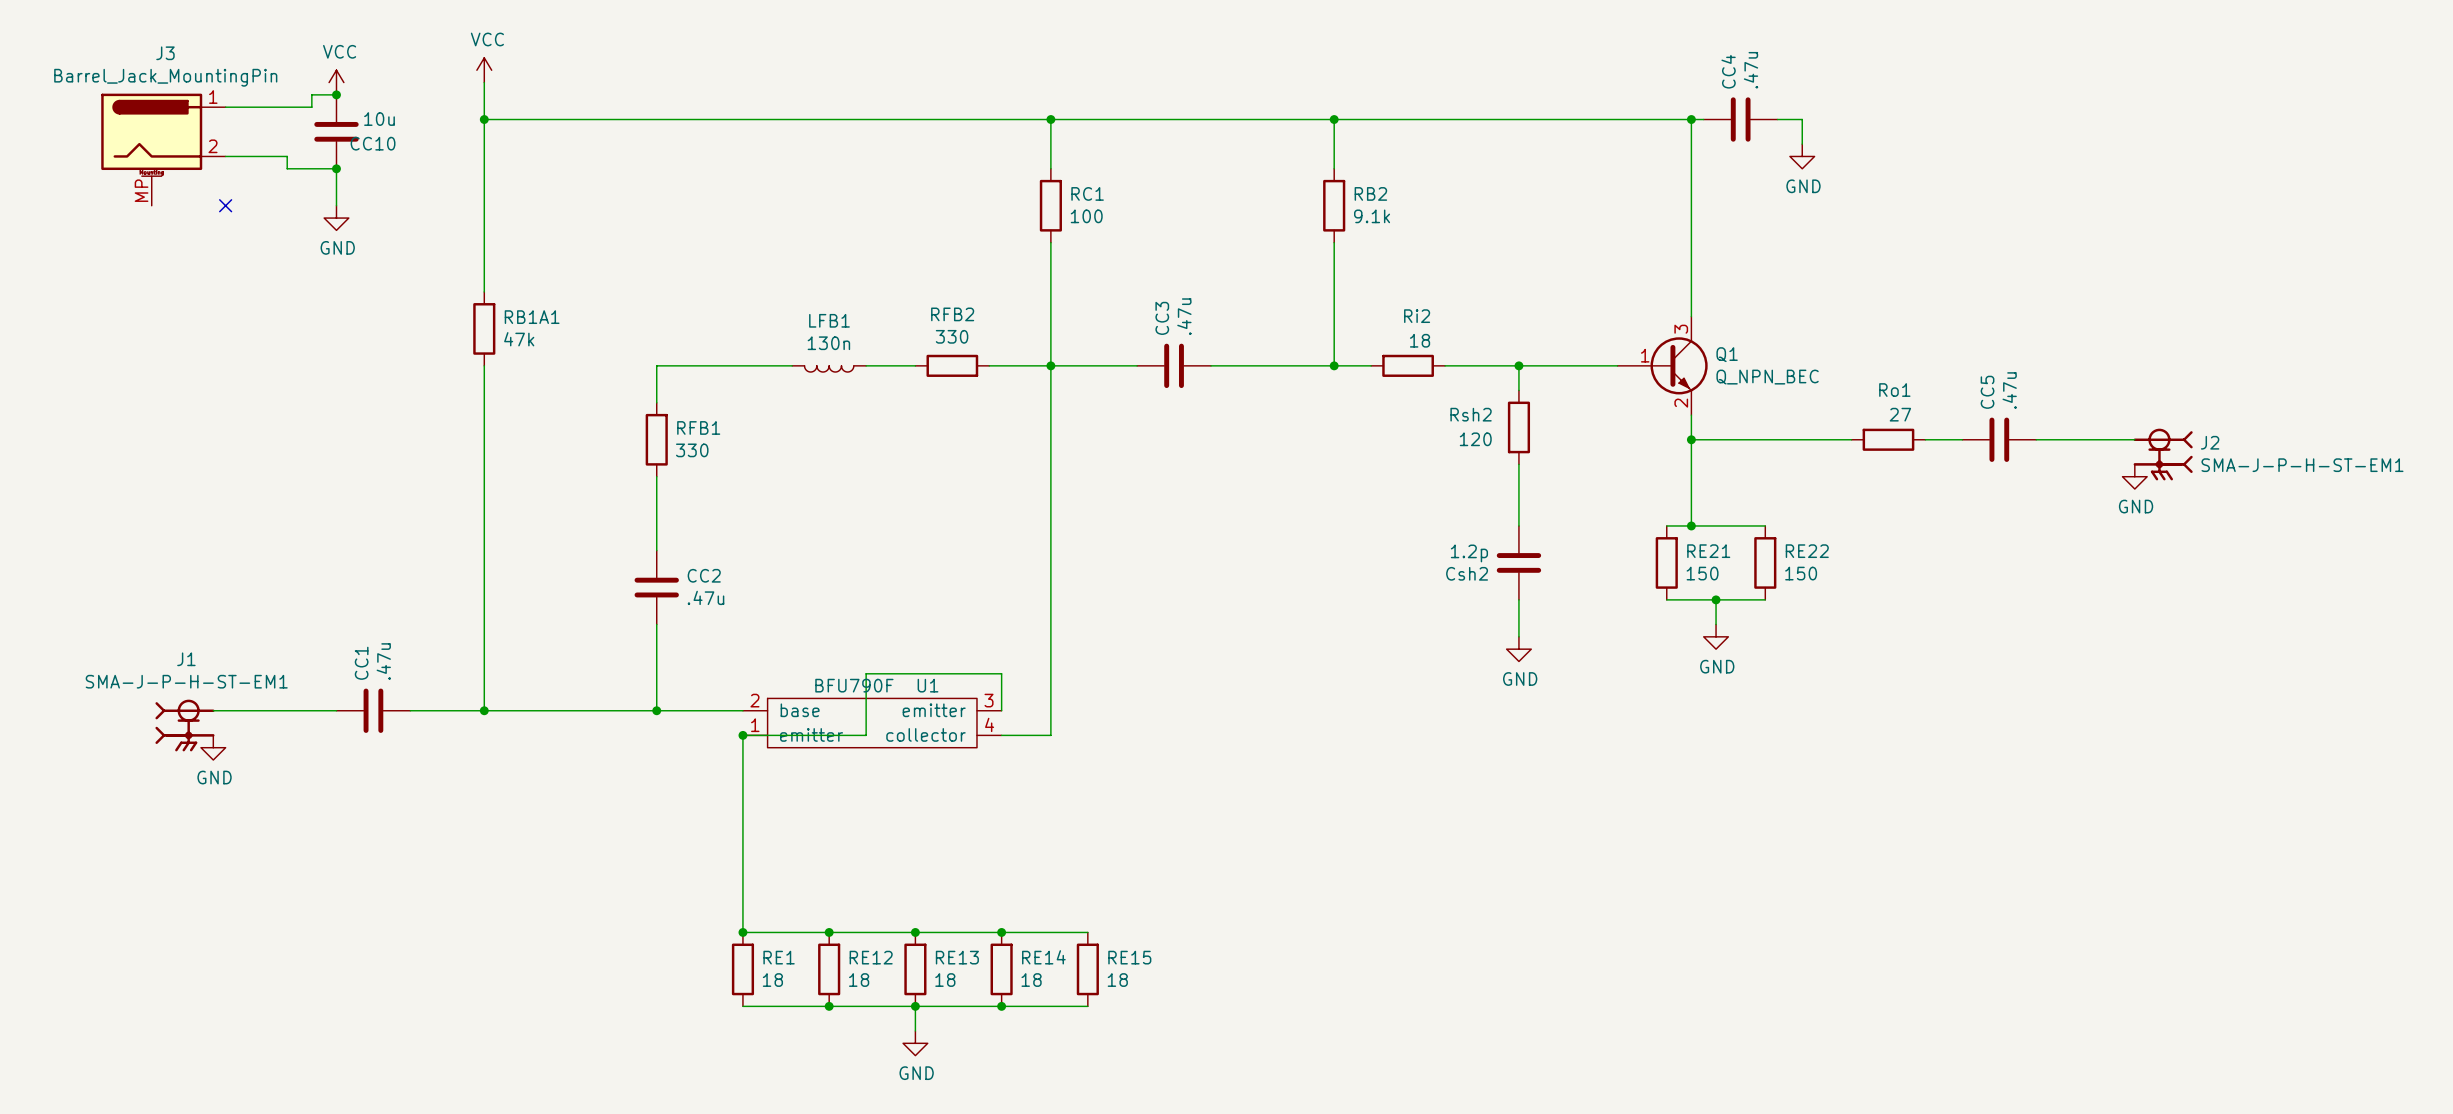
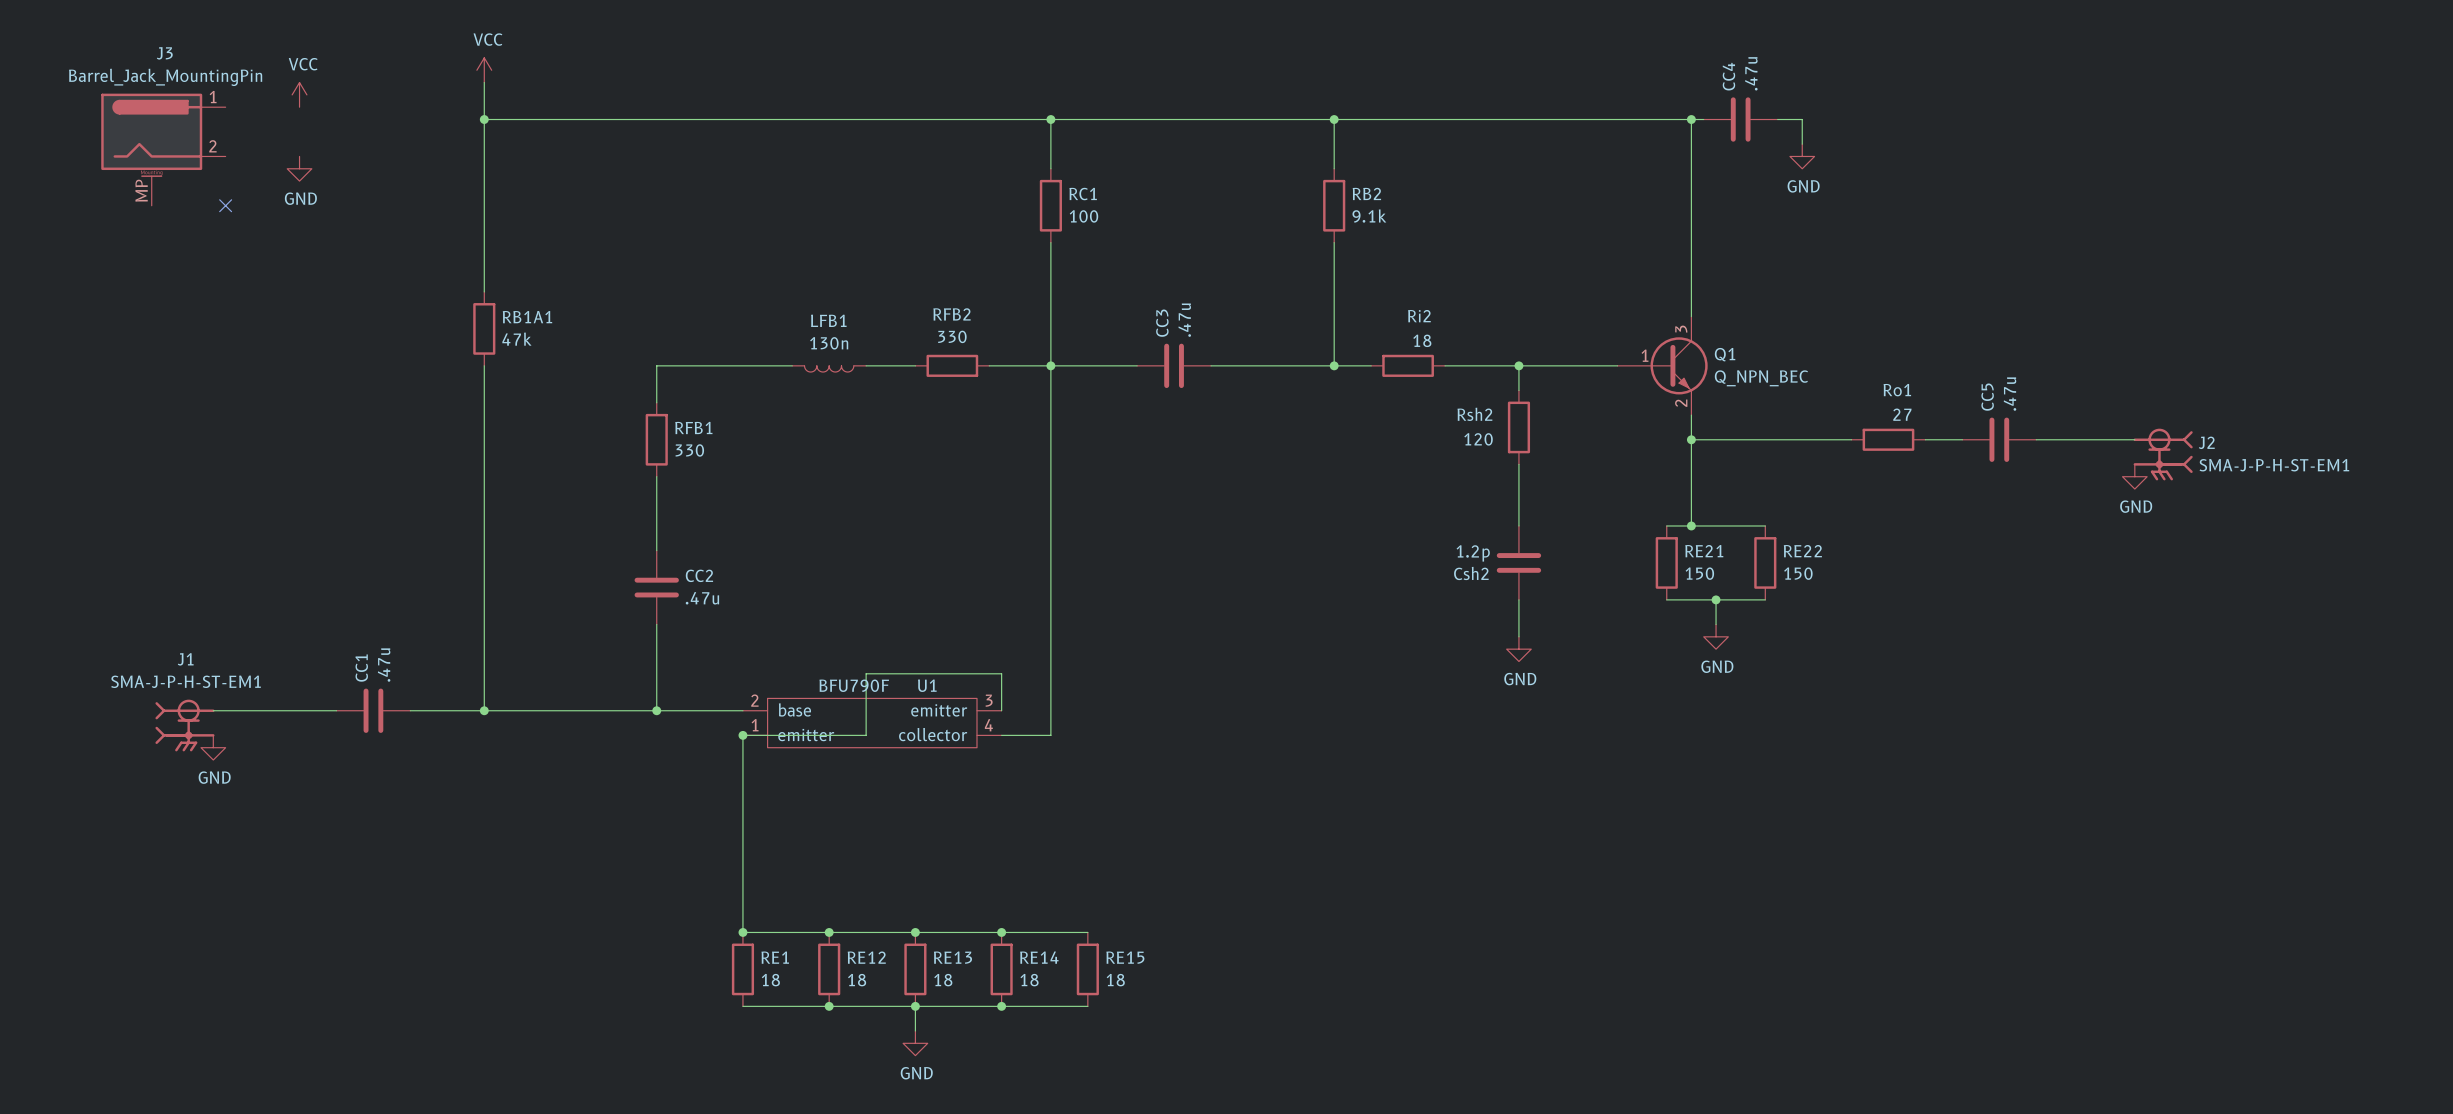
power symbol position: VCC (336, 82) -> VCC (299, 94)
wire: (336, 94) (311, 94) (311, 107) (225, 107) -> none
junction: (336, 94) -> none
CC10: 10u (336, 131) -> none
wire: (225, 156) (287, 156) (287, 168) (336, 168) (336, 205) -> none
junction: (336, 168) -> none
power symbol position: GND (336, 218) -> GND (299, 168)

